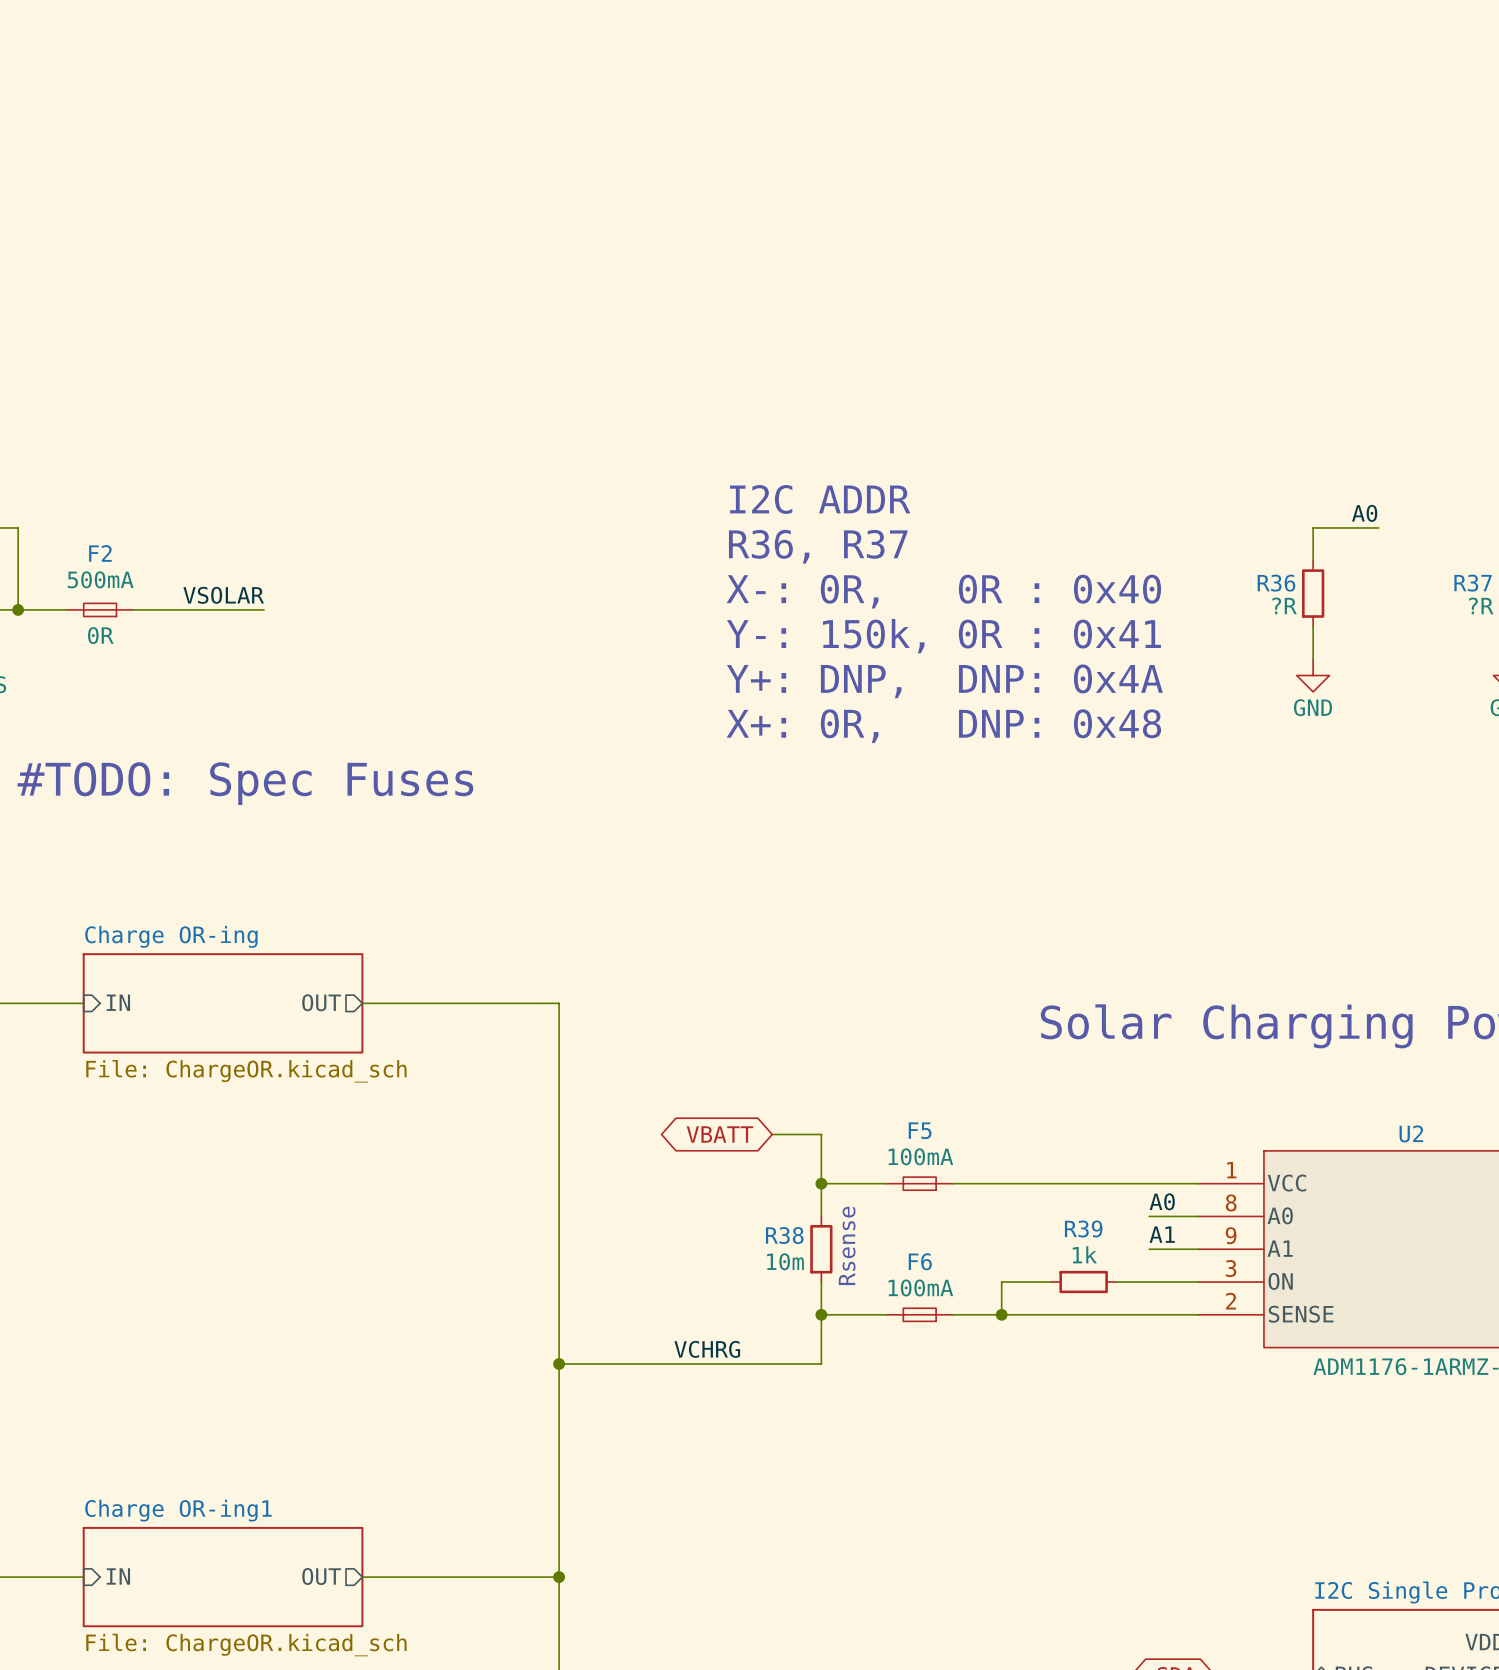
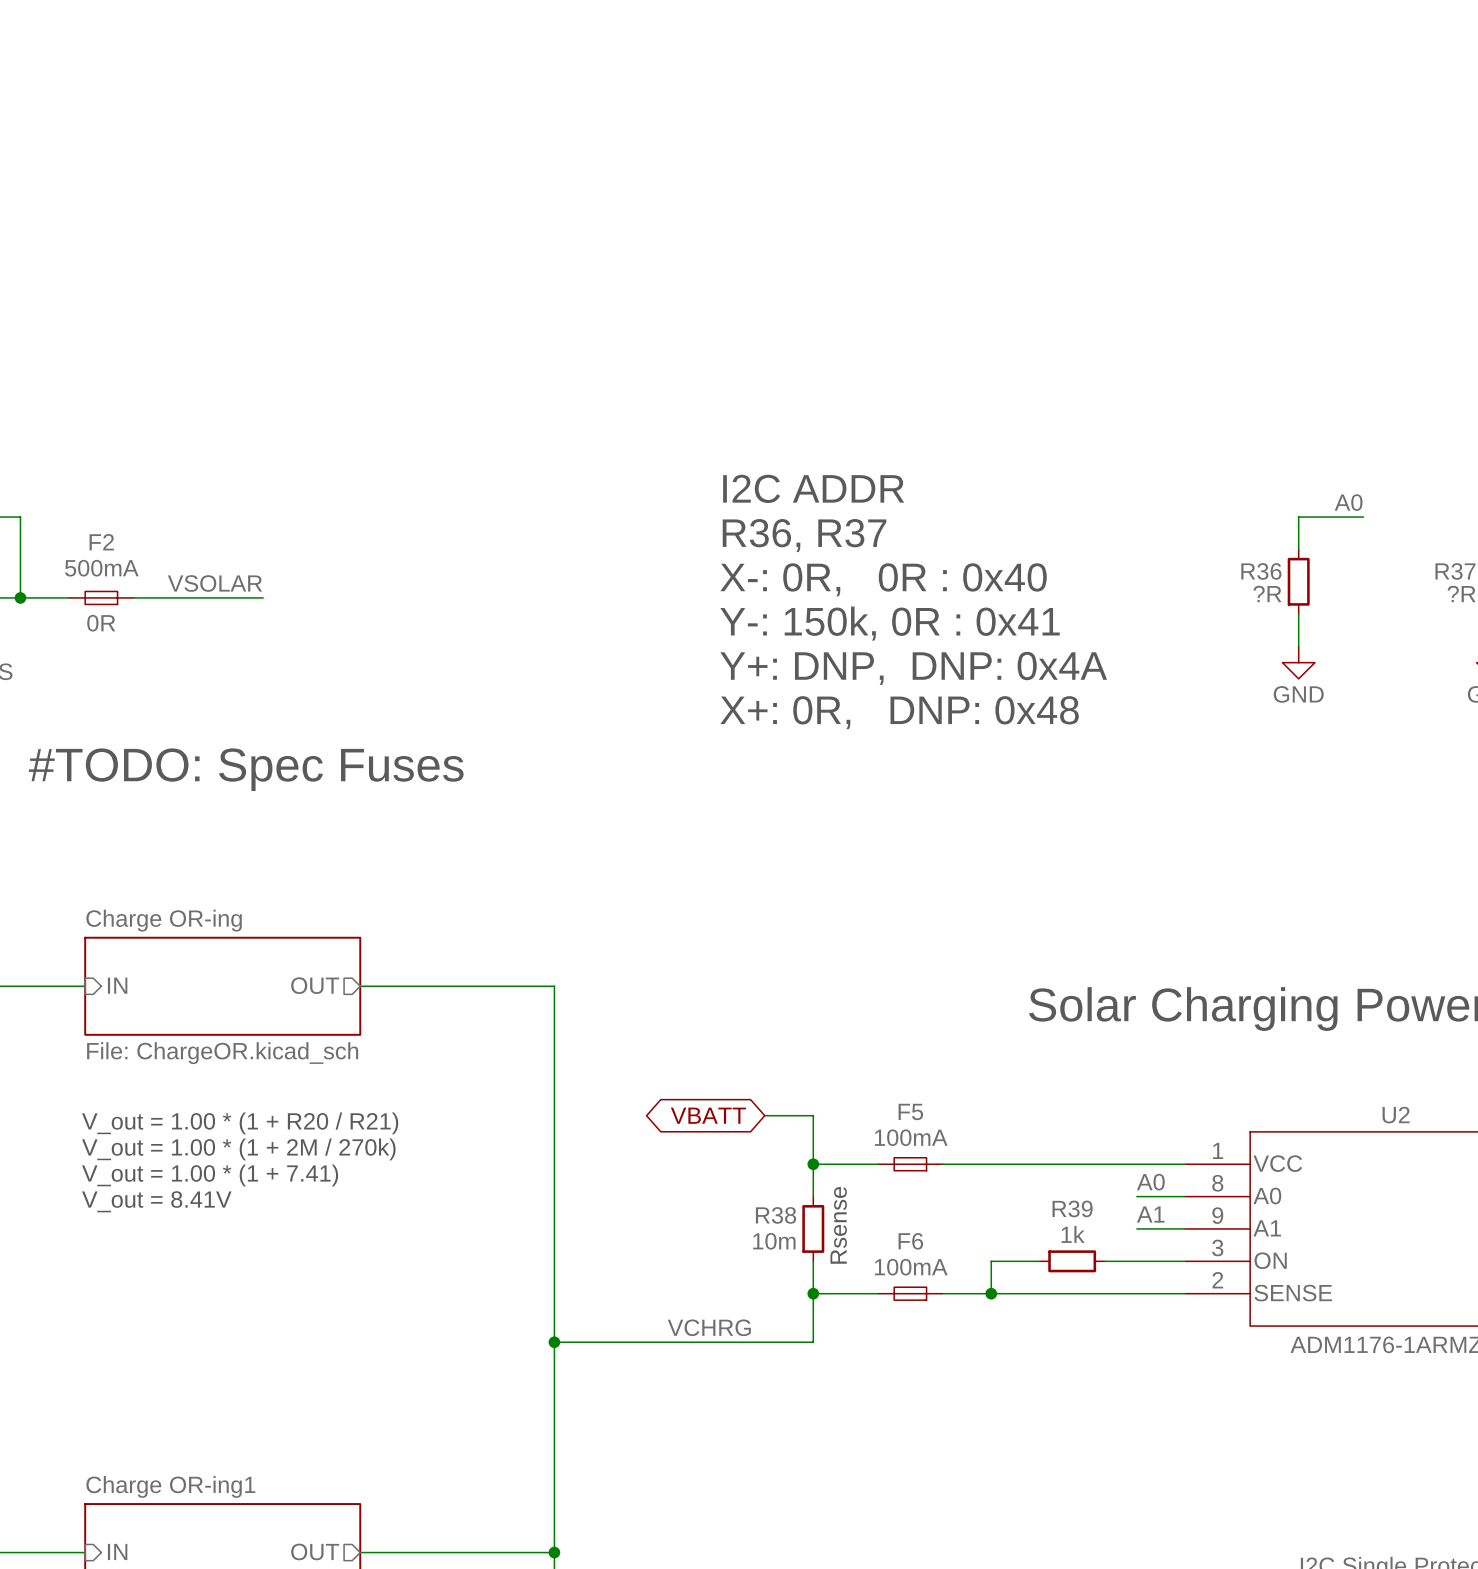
text: none -> V_out = 1.00 * (1 + R20 / R21) (240, 1123)
text: none -> V_out = 1.00 * (1 + 2M / 270k) (238, 1149)
text: none -> V_out = 1.00 * (1 + 7.41) (210, 1175)
text: none -> V_out = 8.41V (156, 1201)

